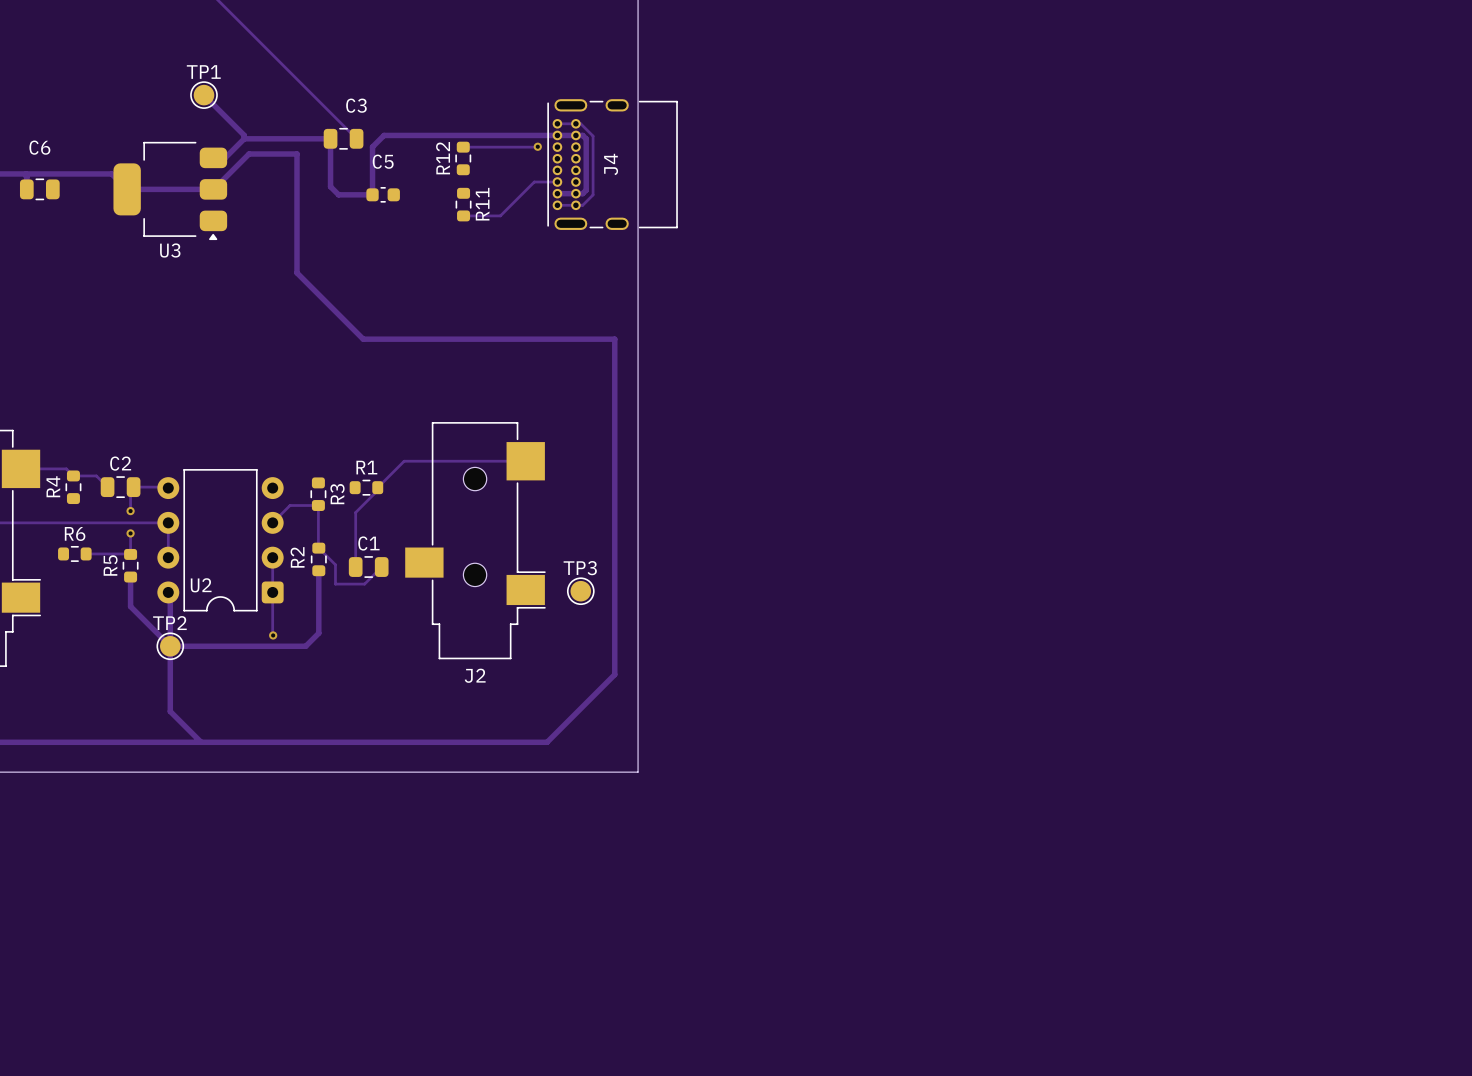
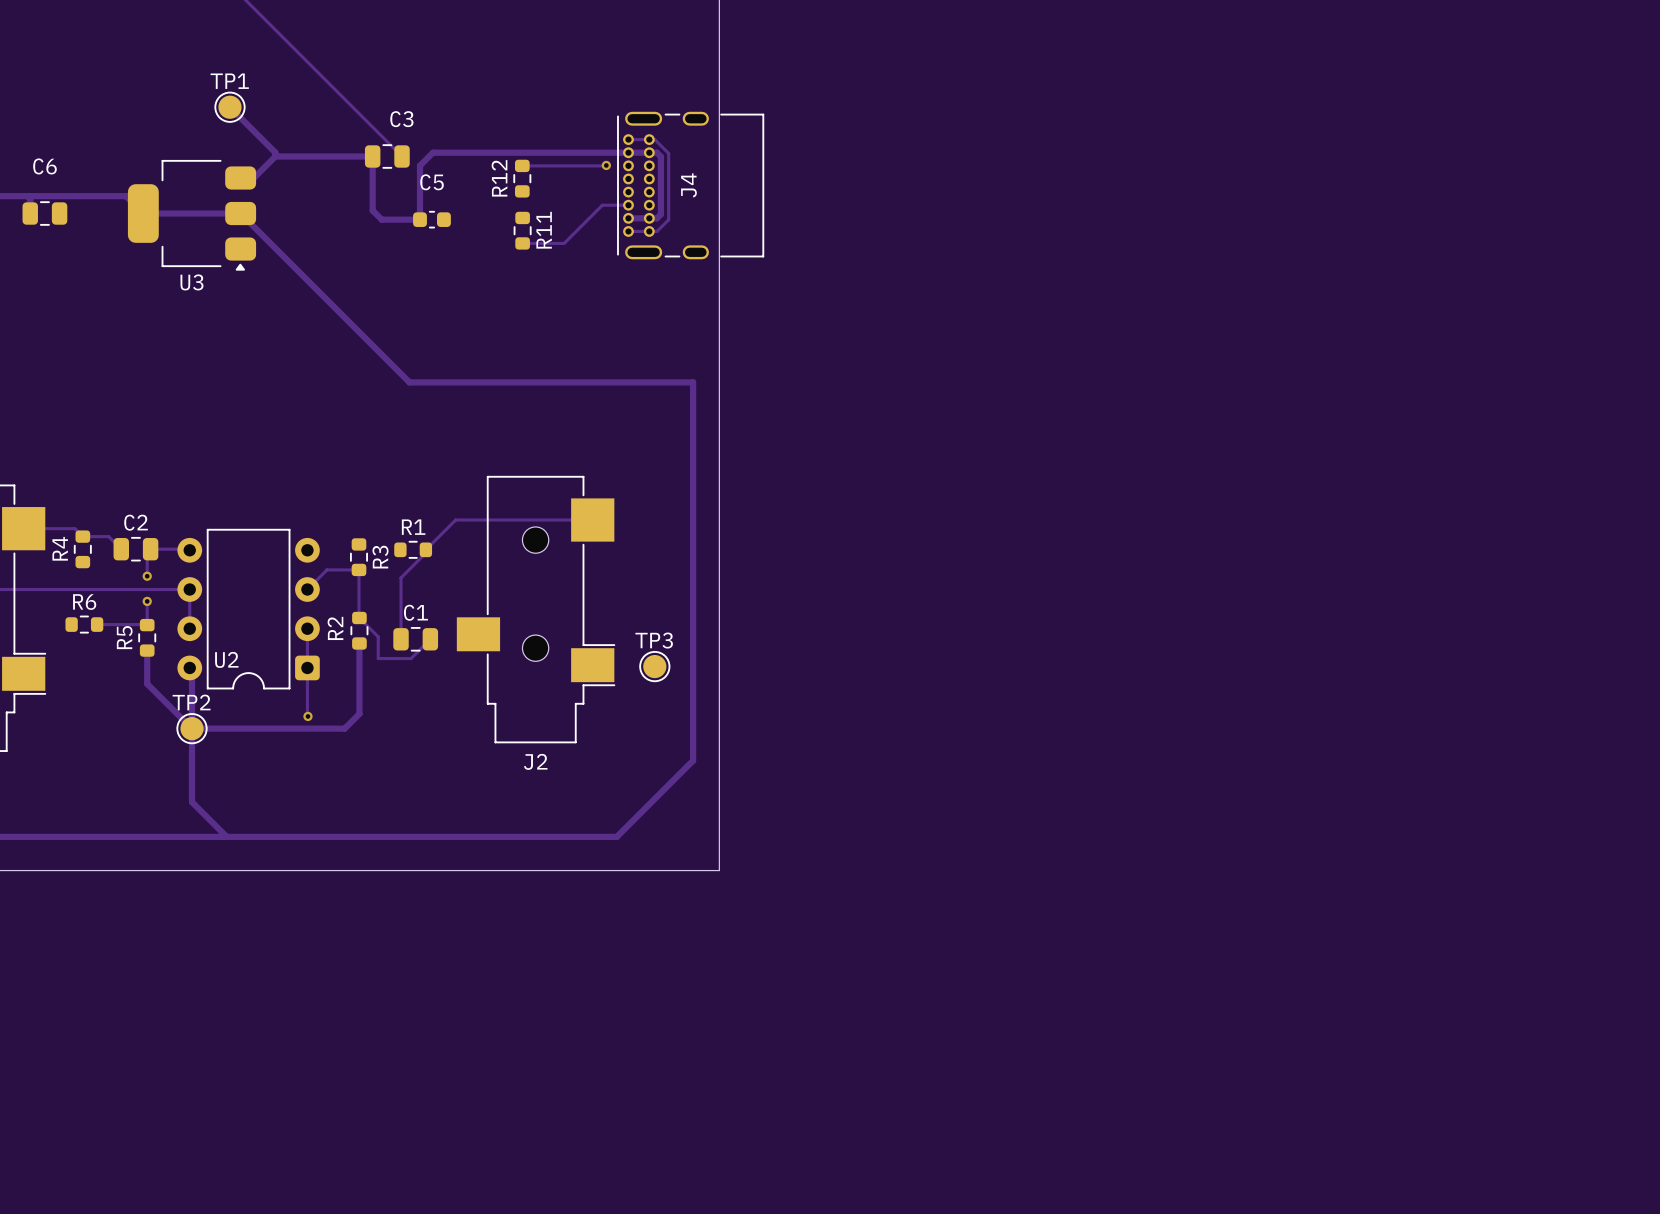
track: (213, 189) (249, 154) (296, 154) (296, 272) -> (240, 213) (334, 307)

